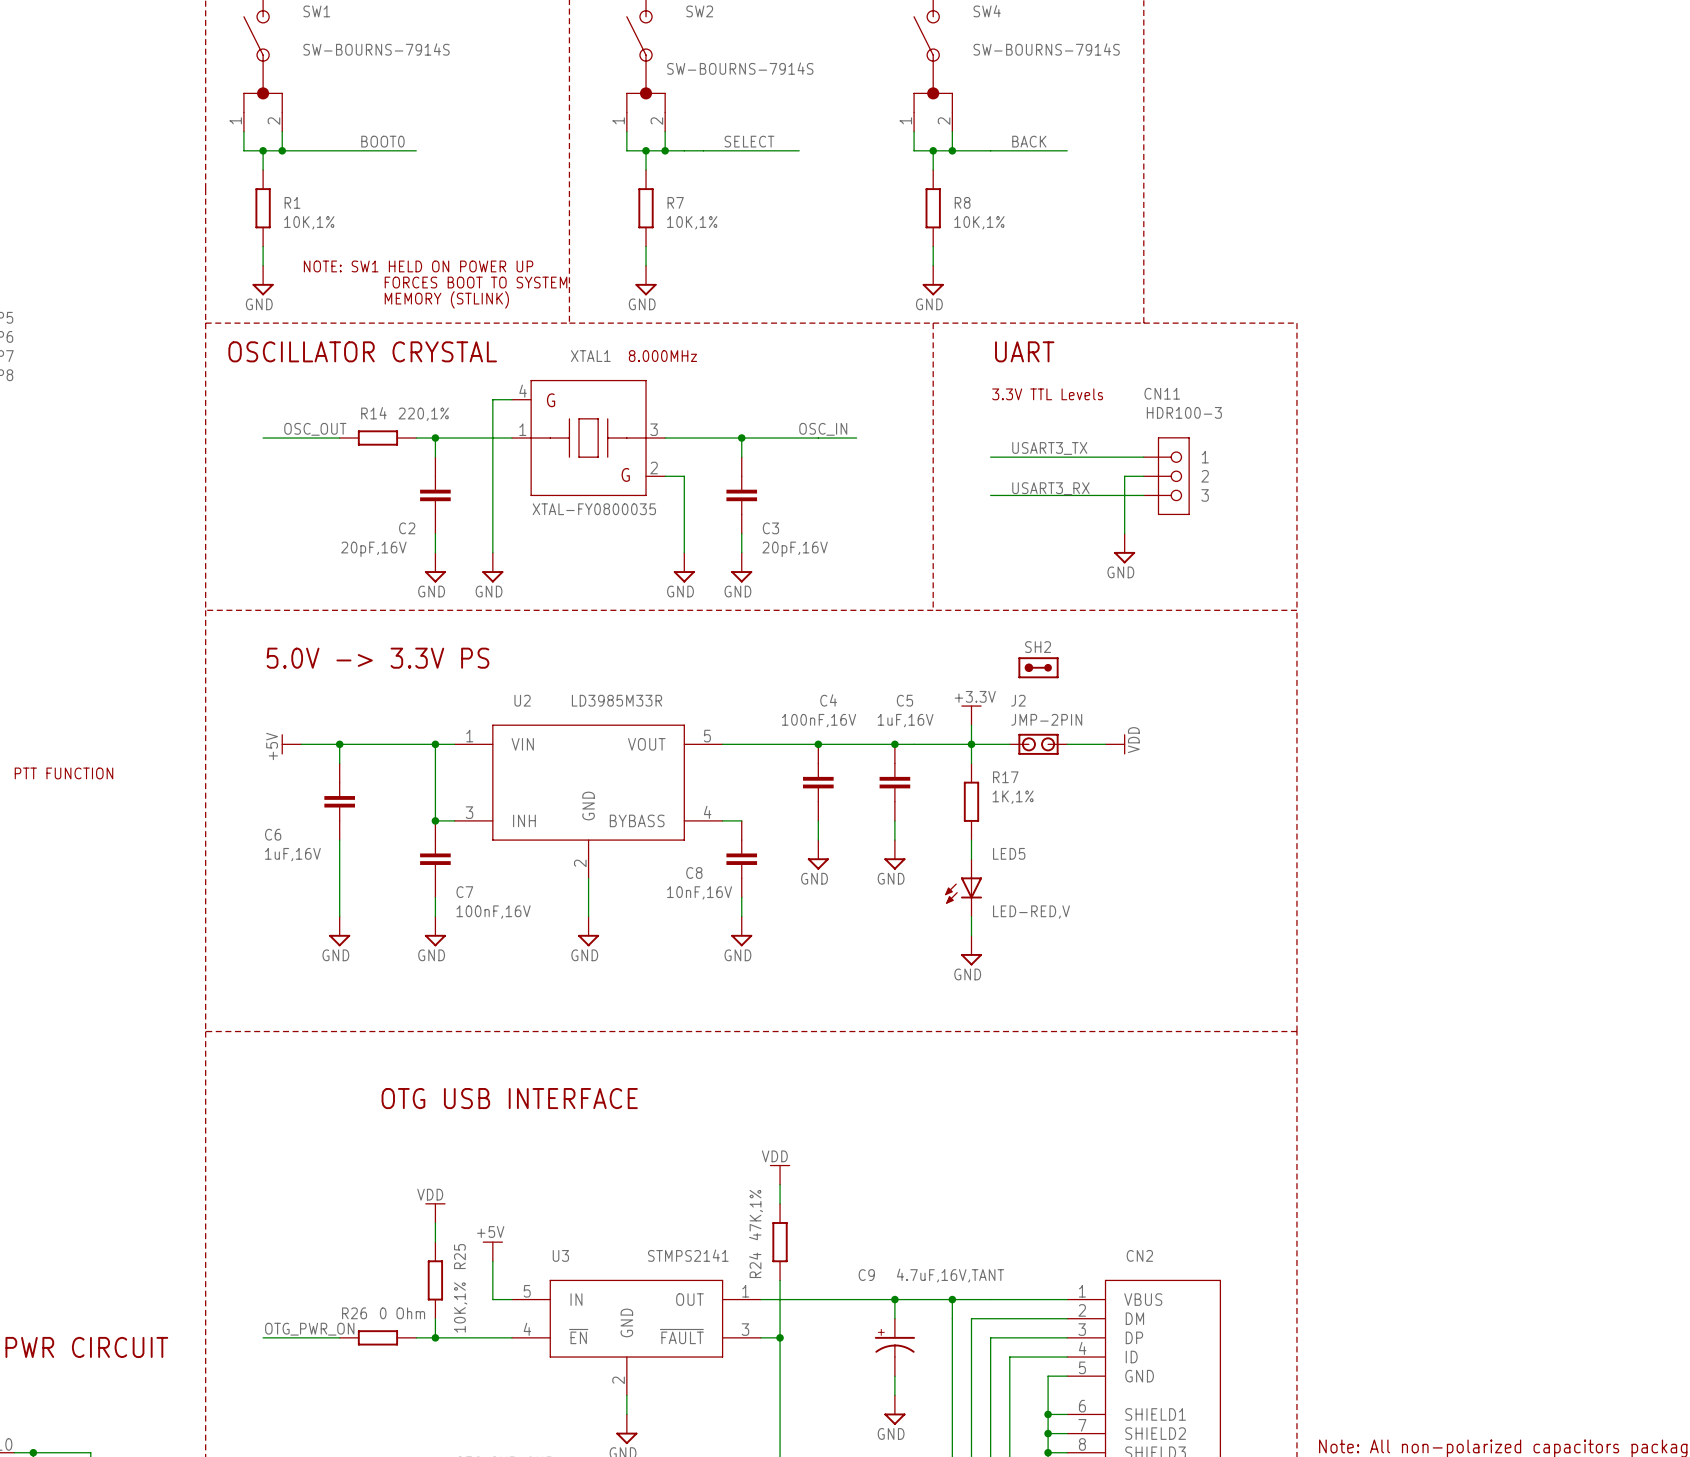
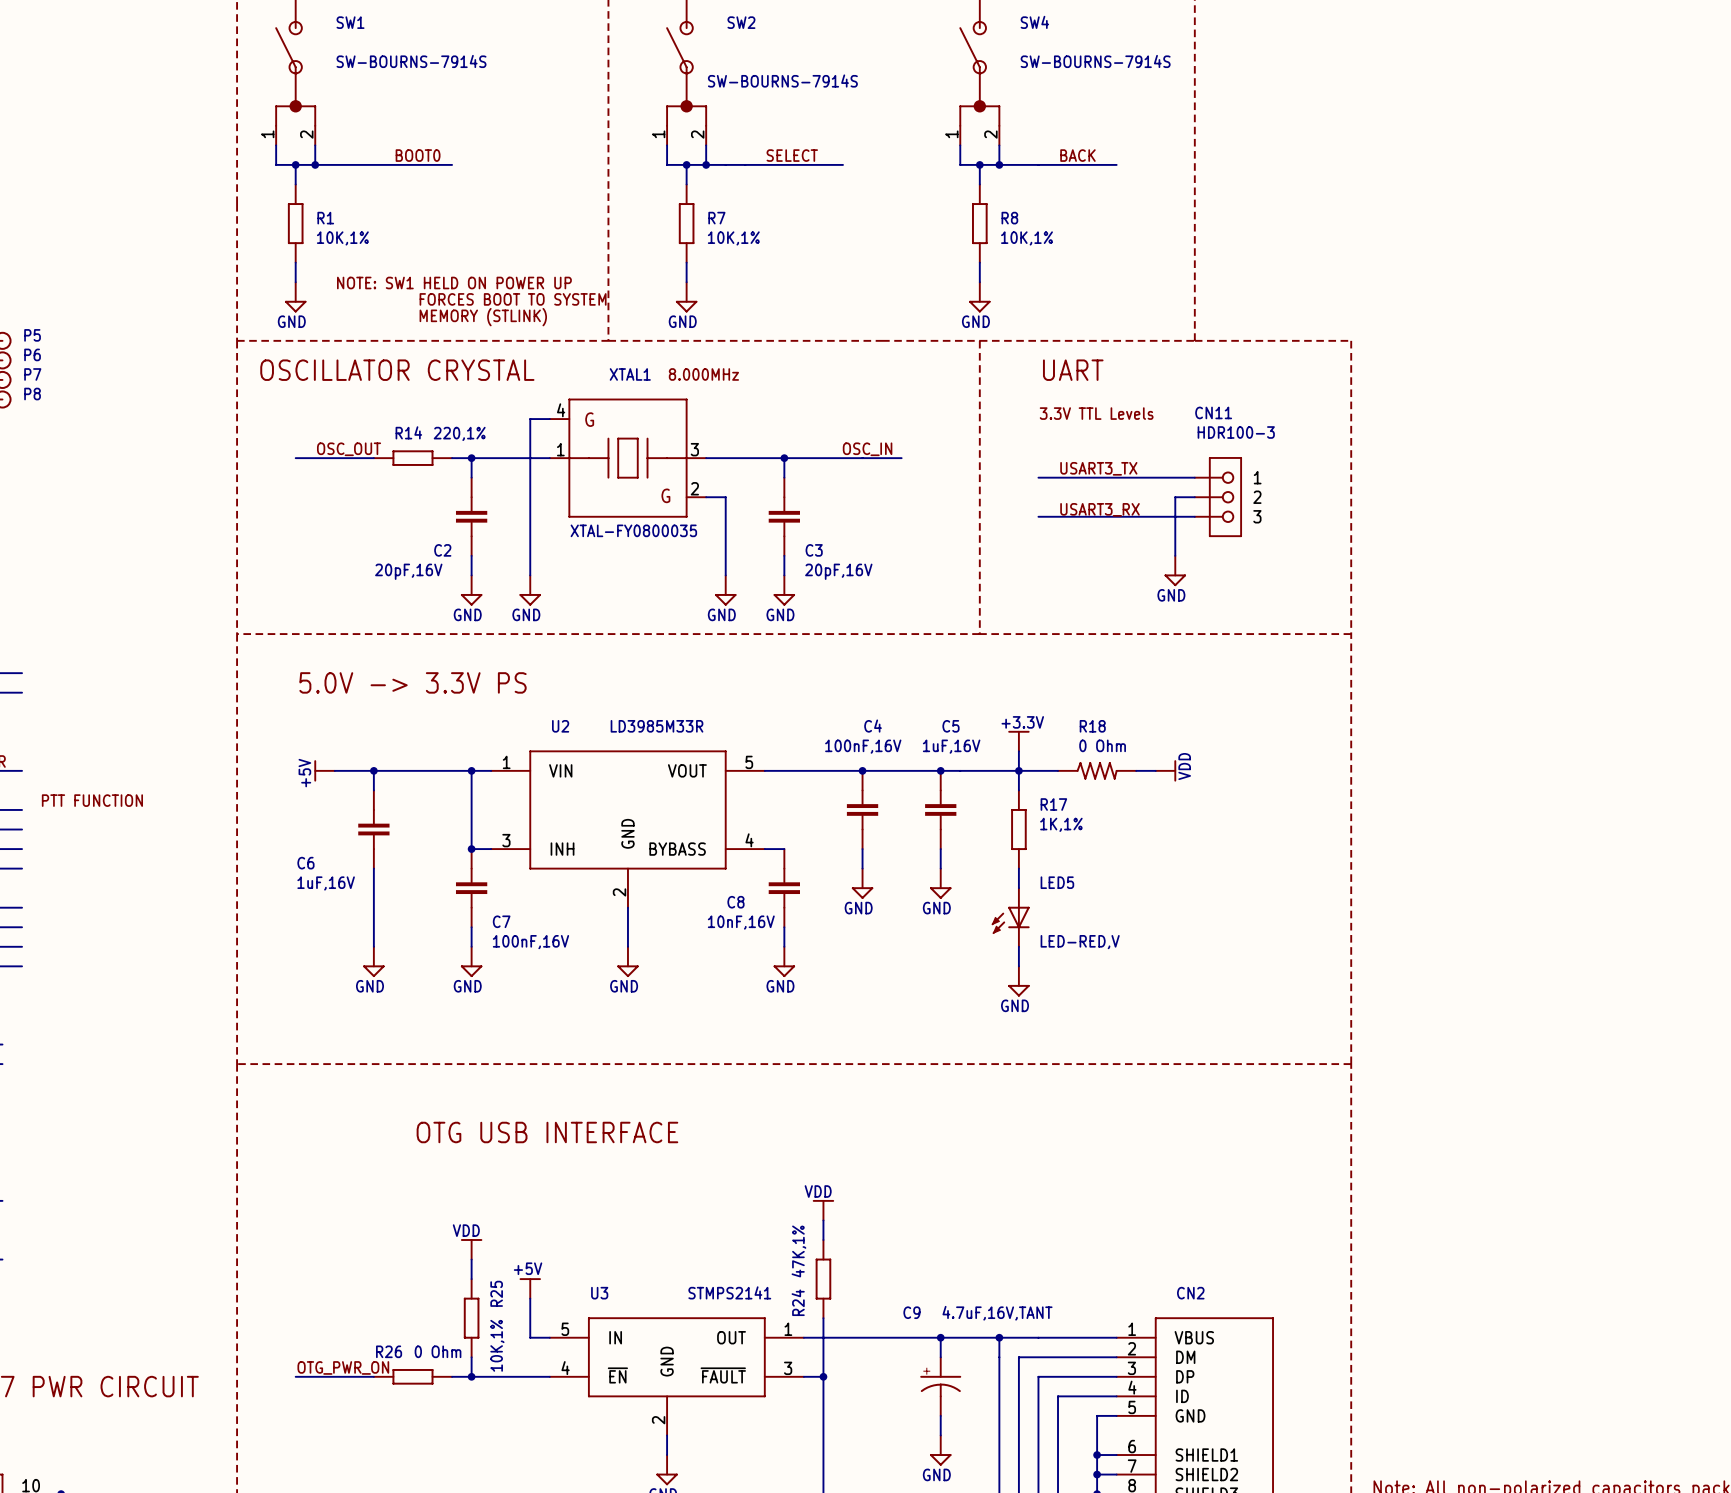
SH2: (1038, 667) -> none
J2: JMP-2PIN (1038, 744) -> none
R18: none -> 0 Ohm (1097, 770)

